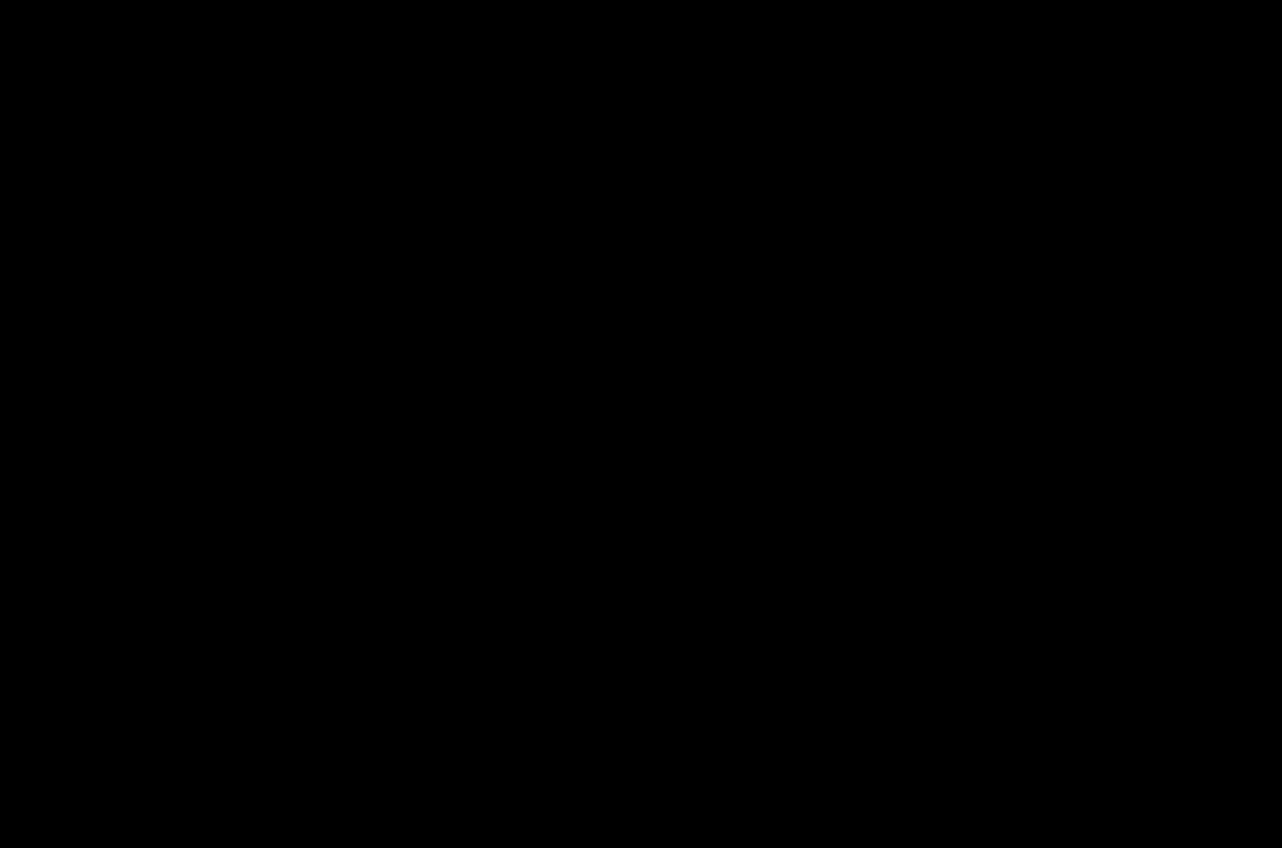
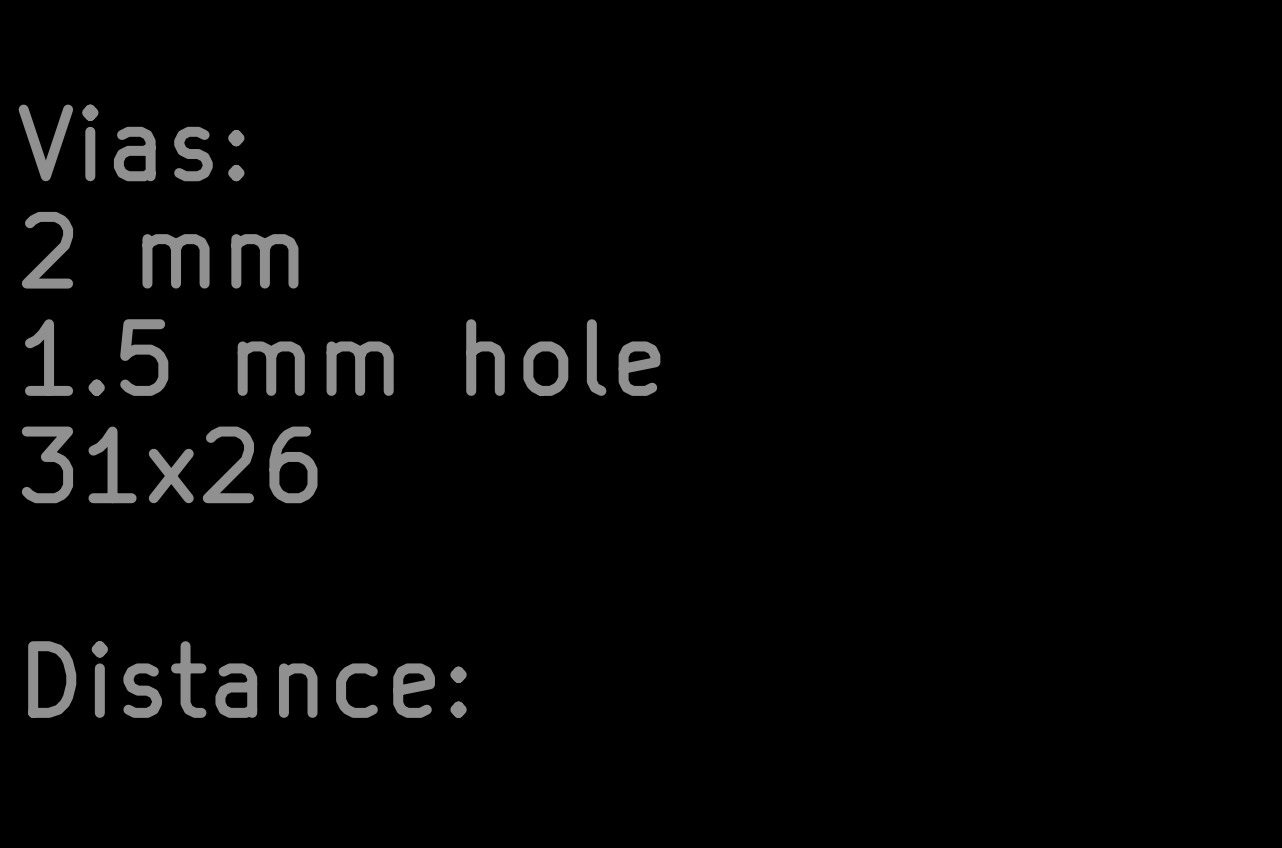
text: none -> Vias: (131, 142)
text: none -> 2 mm (160, 250)
text: none -> 1.5 mm hole (342, 357)
text: none -> 31x26 (169, 464)
text: none -> Distance: (247, 679)

